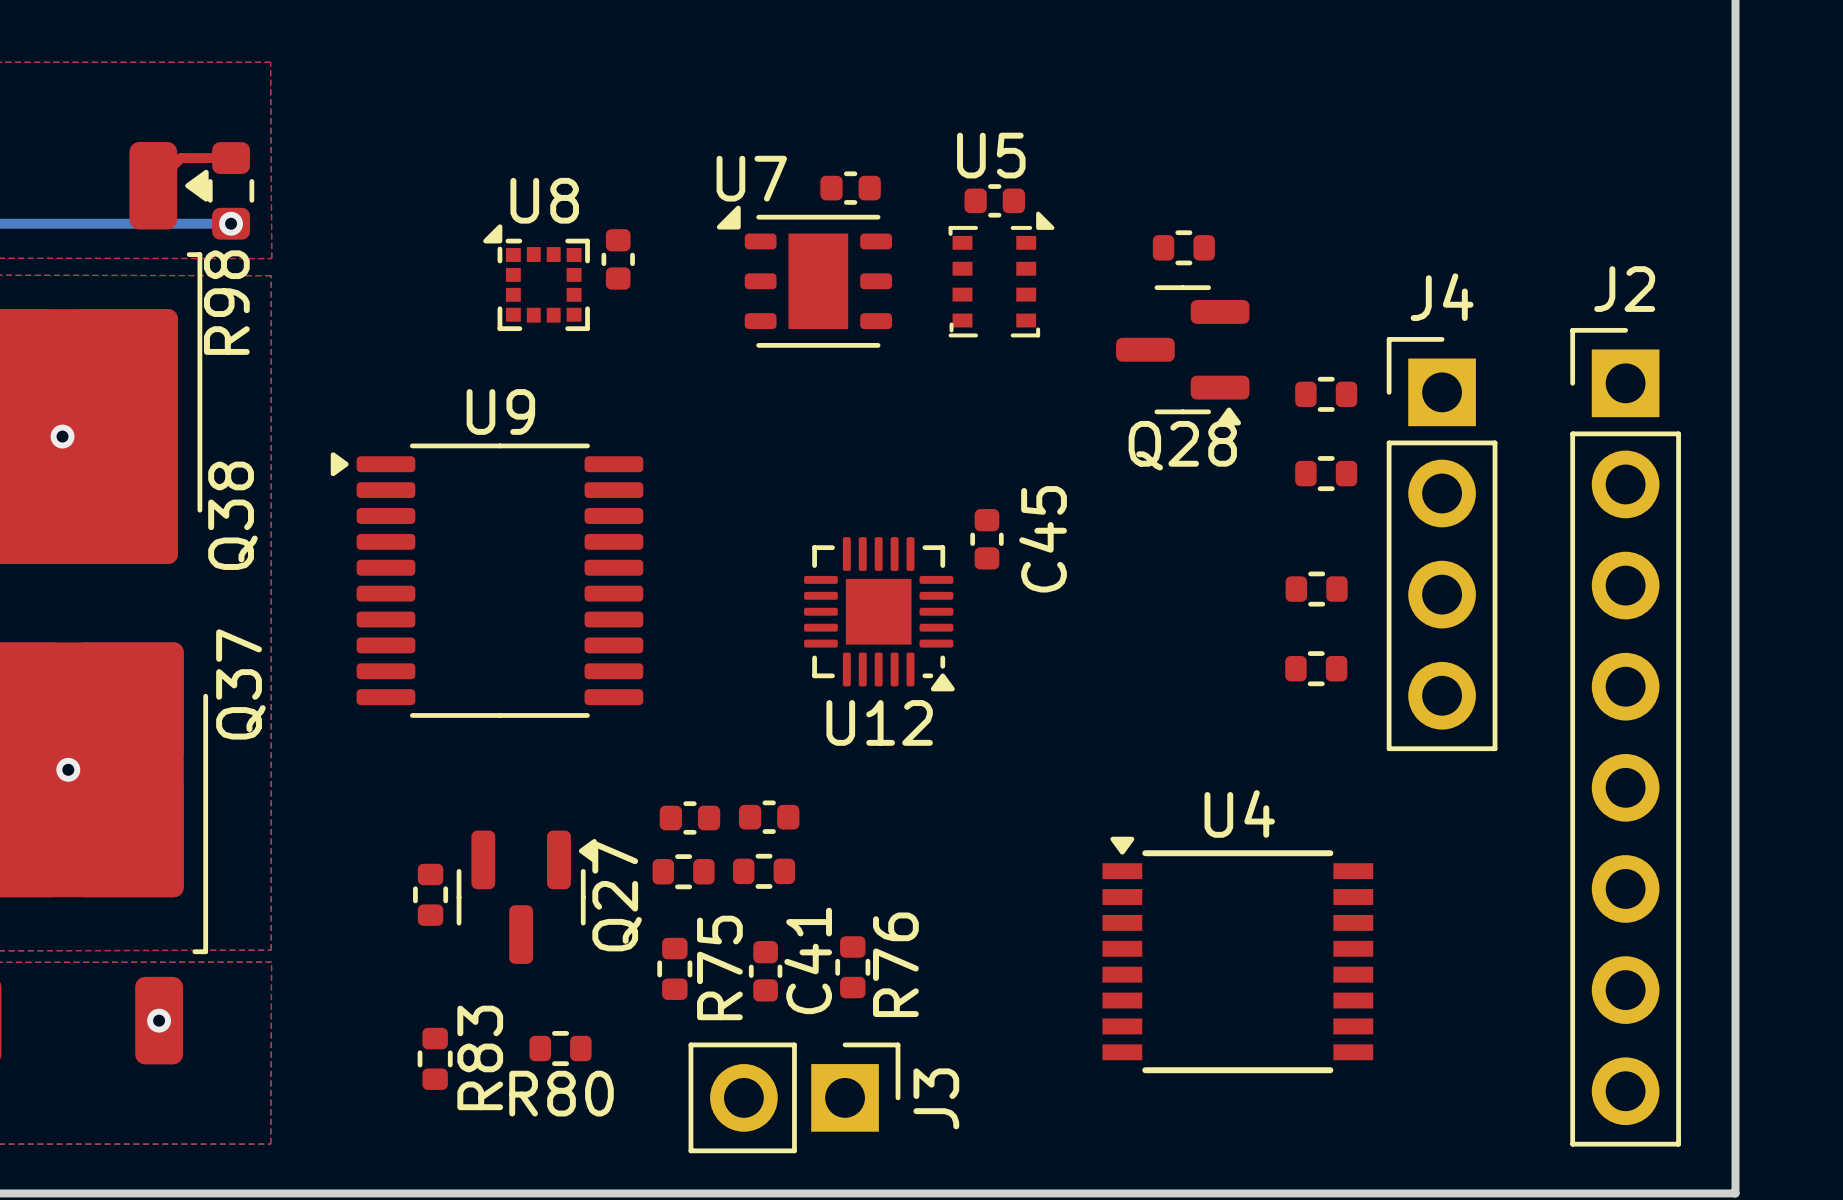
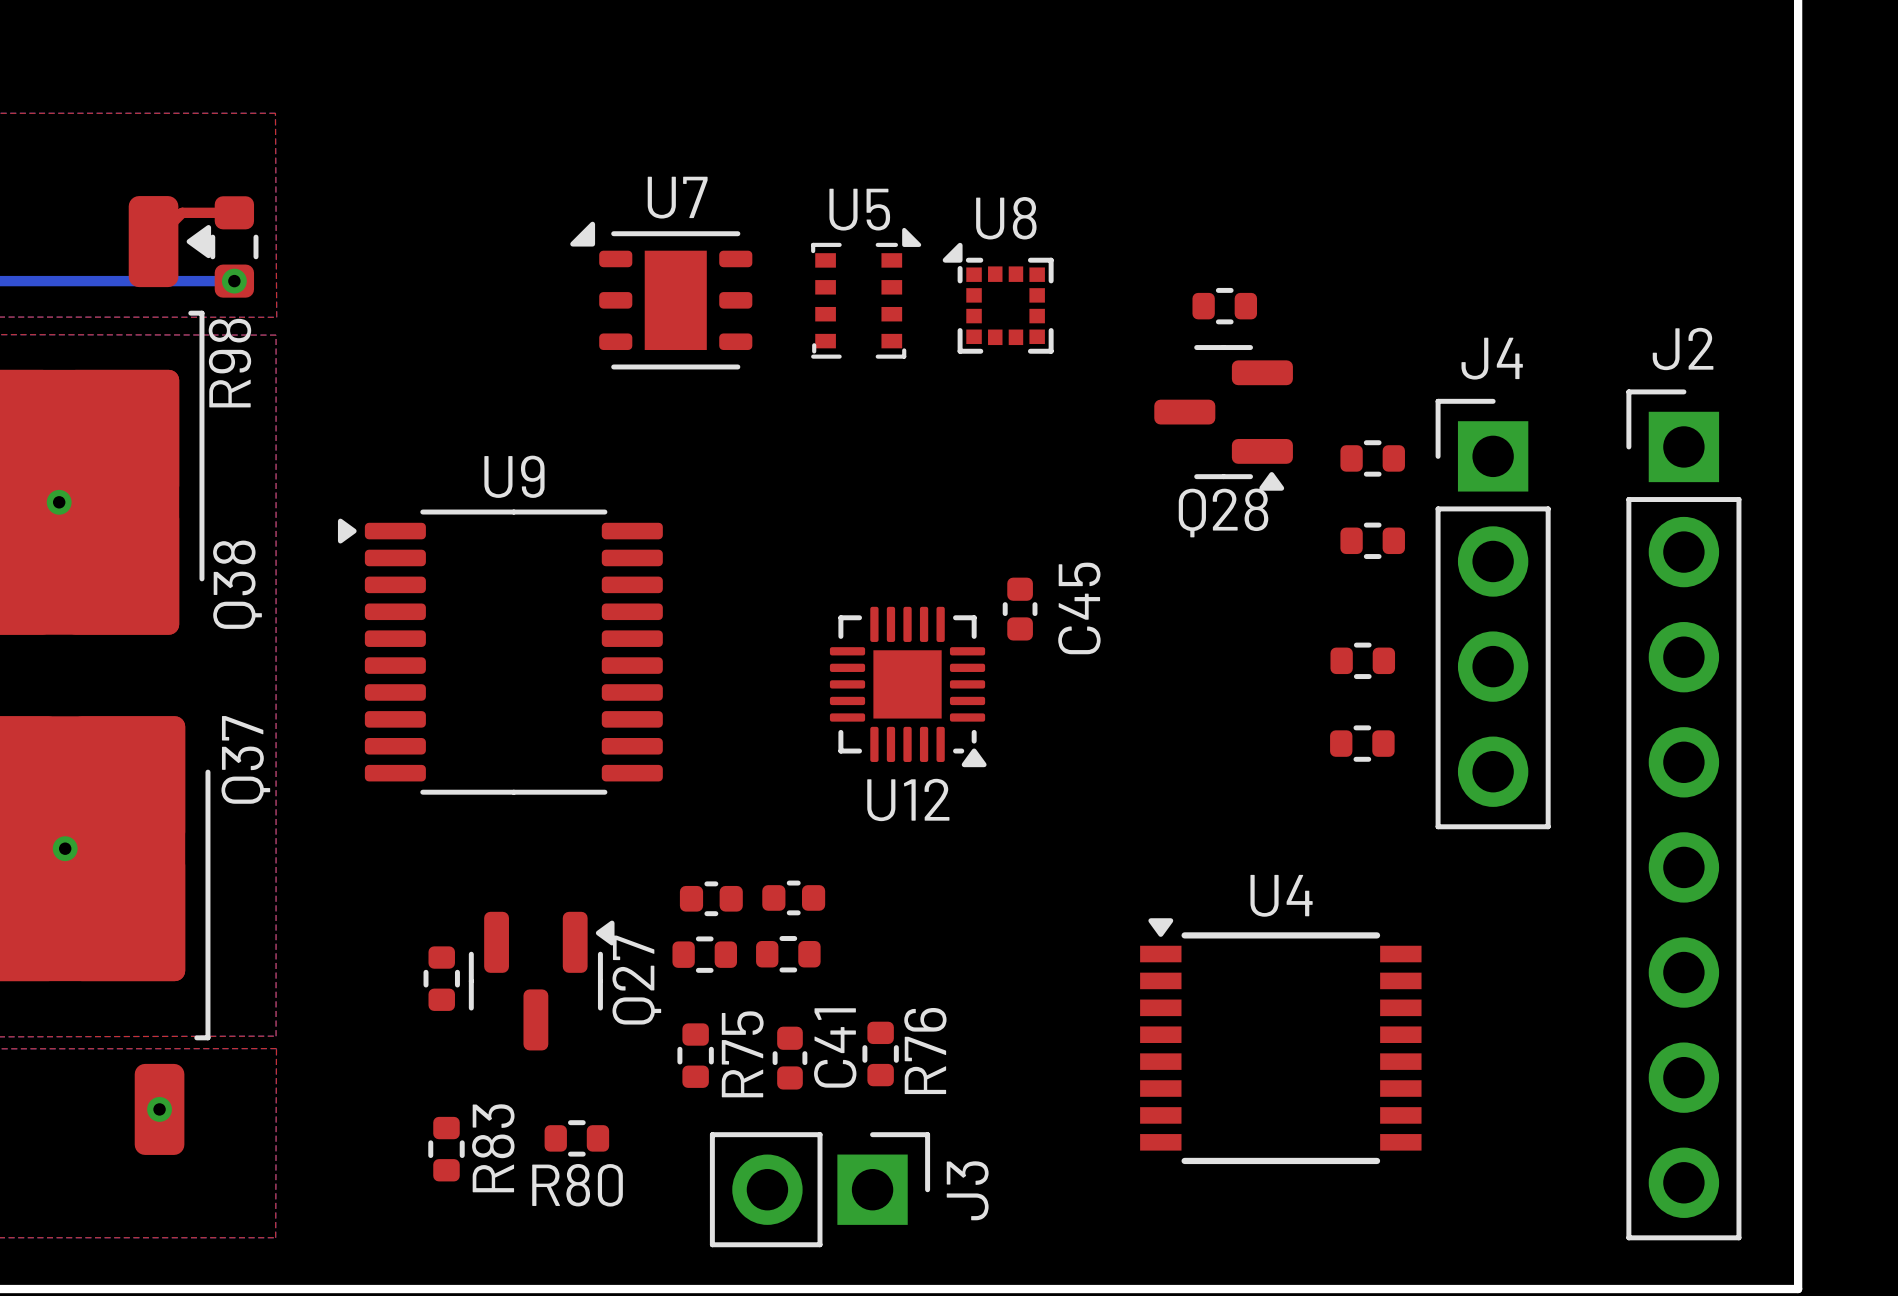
U5 name position: U5 (991, 155) -> U5 (859, 209)
U7 name position: U7 (751, 178) -> U7 (677, 197)
part: (850, 188) -> none
part: (994, 200) -> none
part: (618, 259) -> none
U5 position: (1001, 274) -> (866, 293)
U7 position: (804, 276) -> (661, 295)
U8 position: (536, 277) -> (998, 298)

